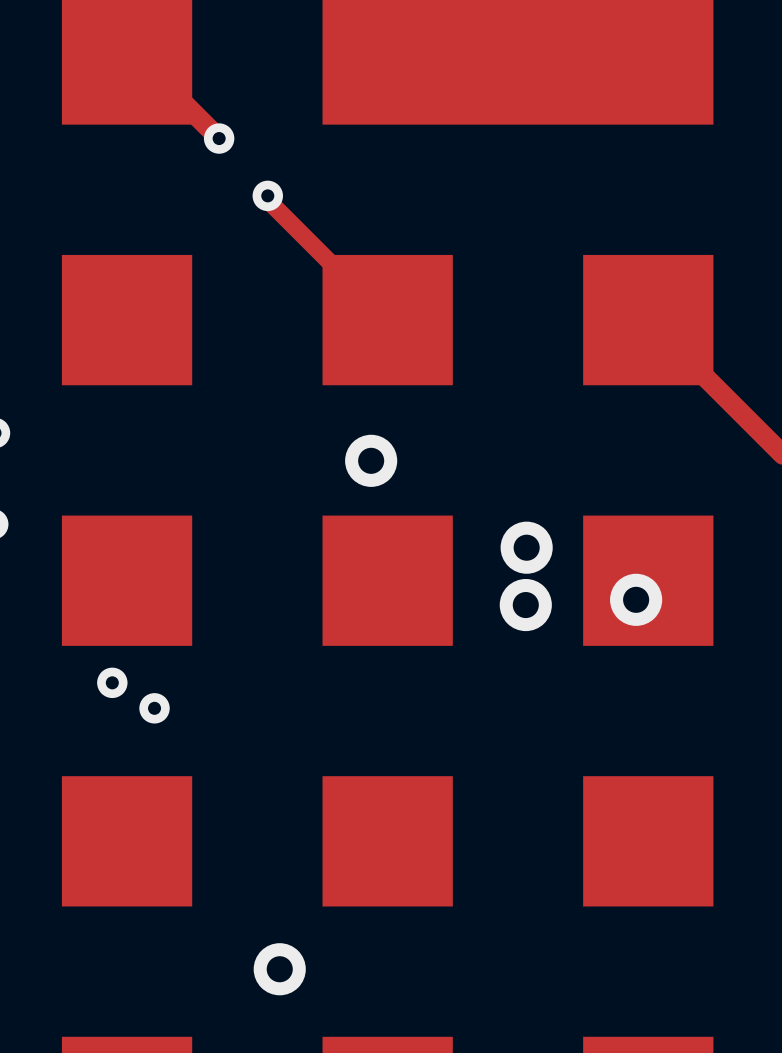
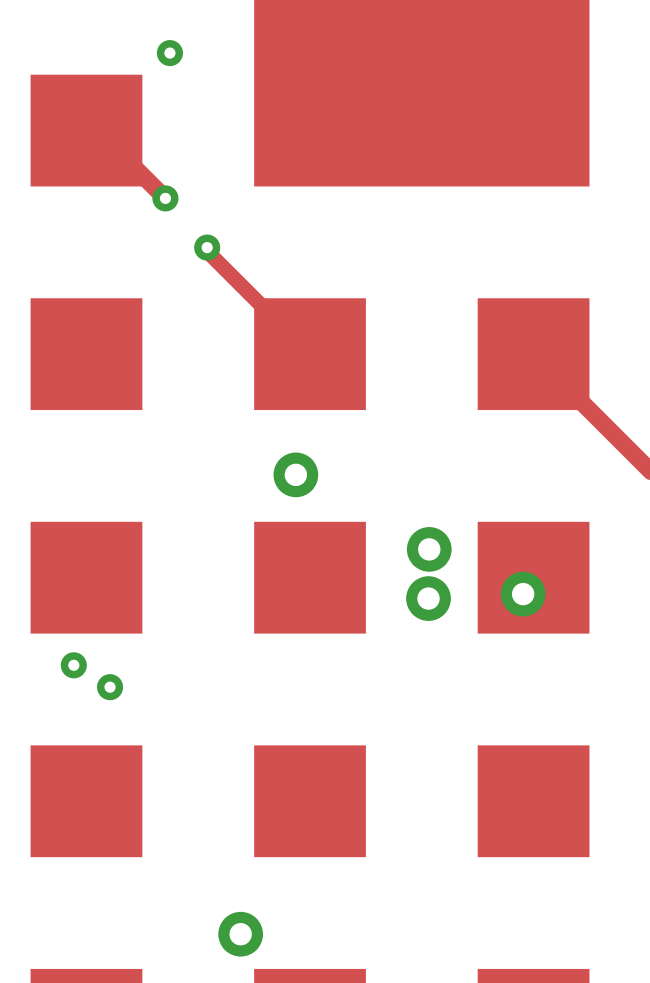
via position: (279, 969) -> (240, 934)

